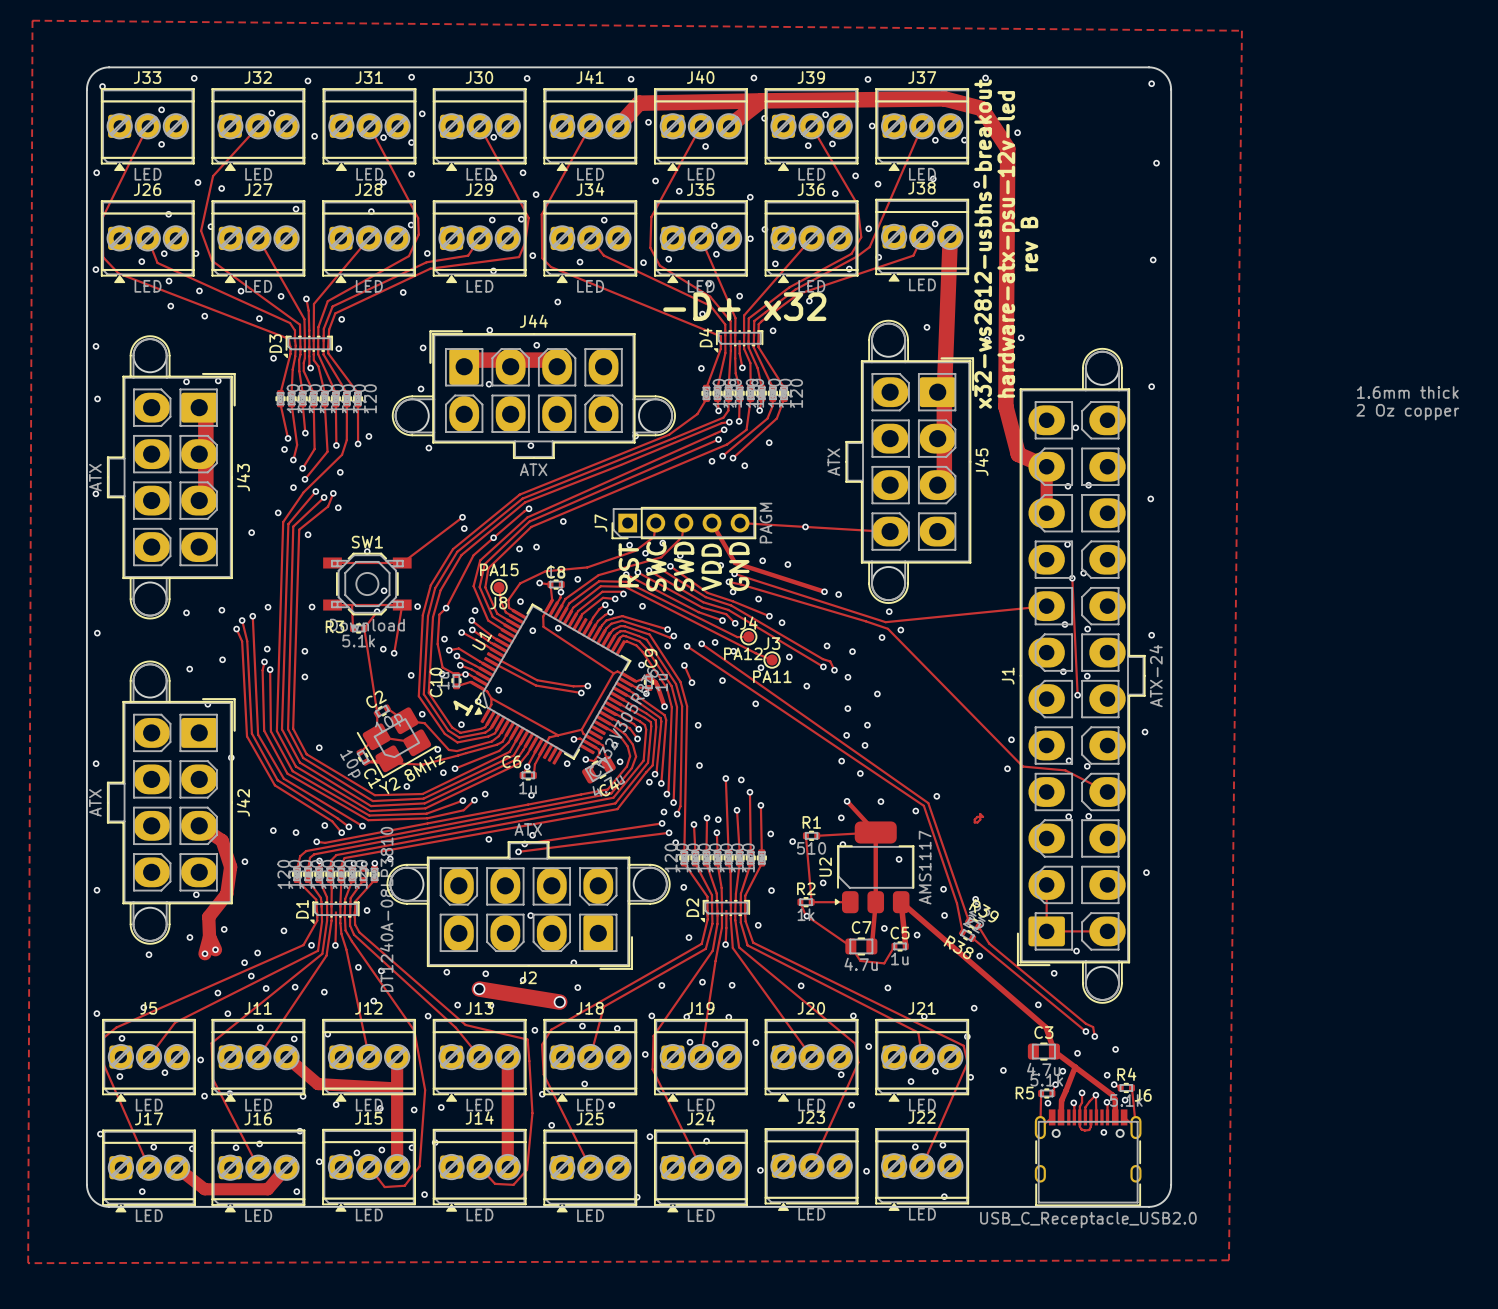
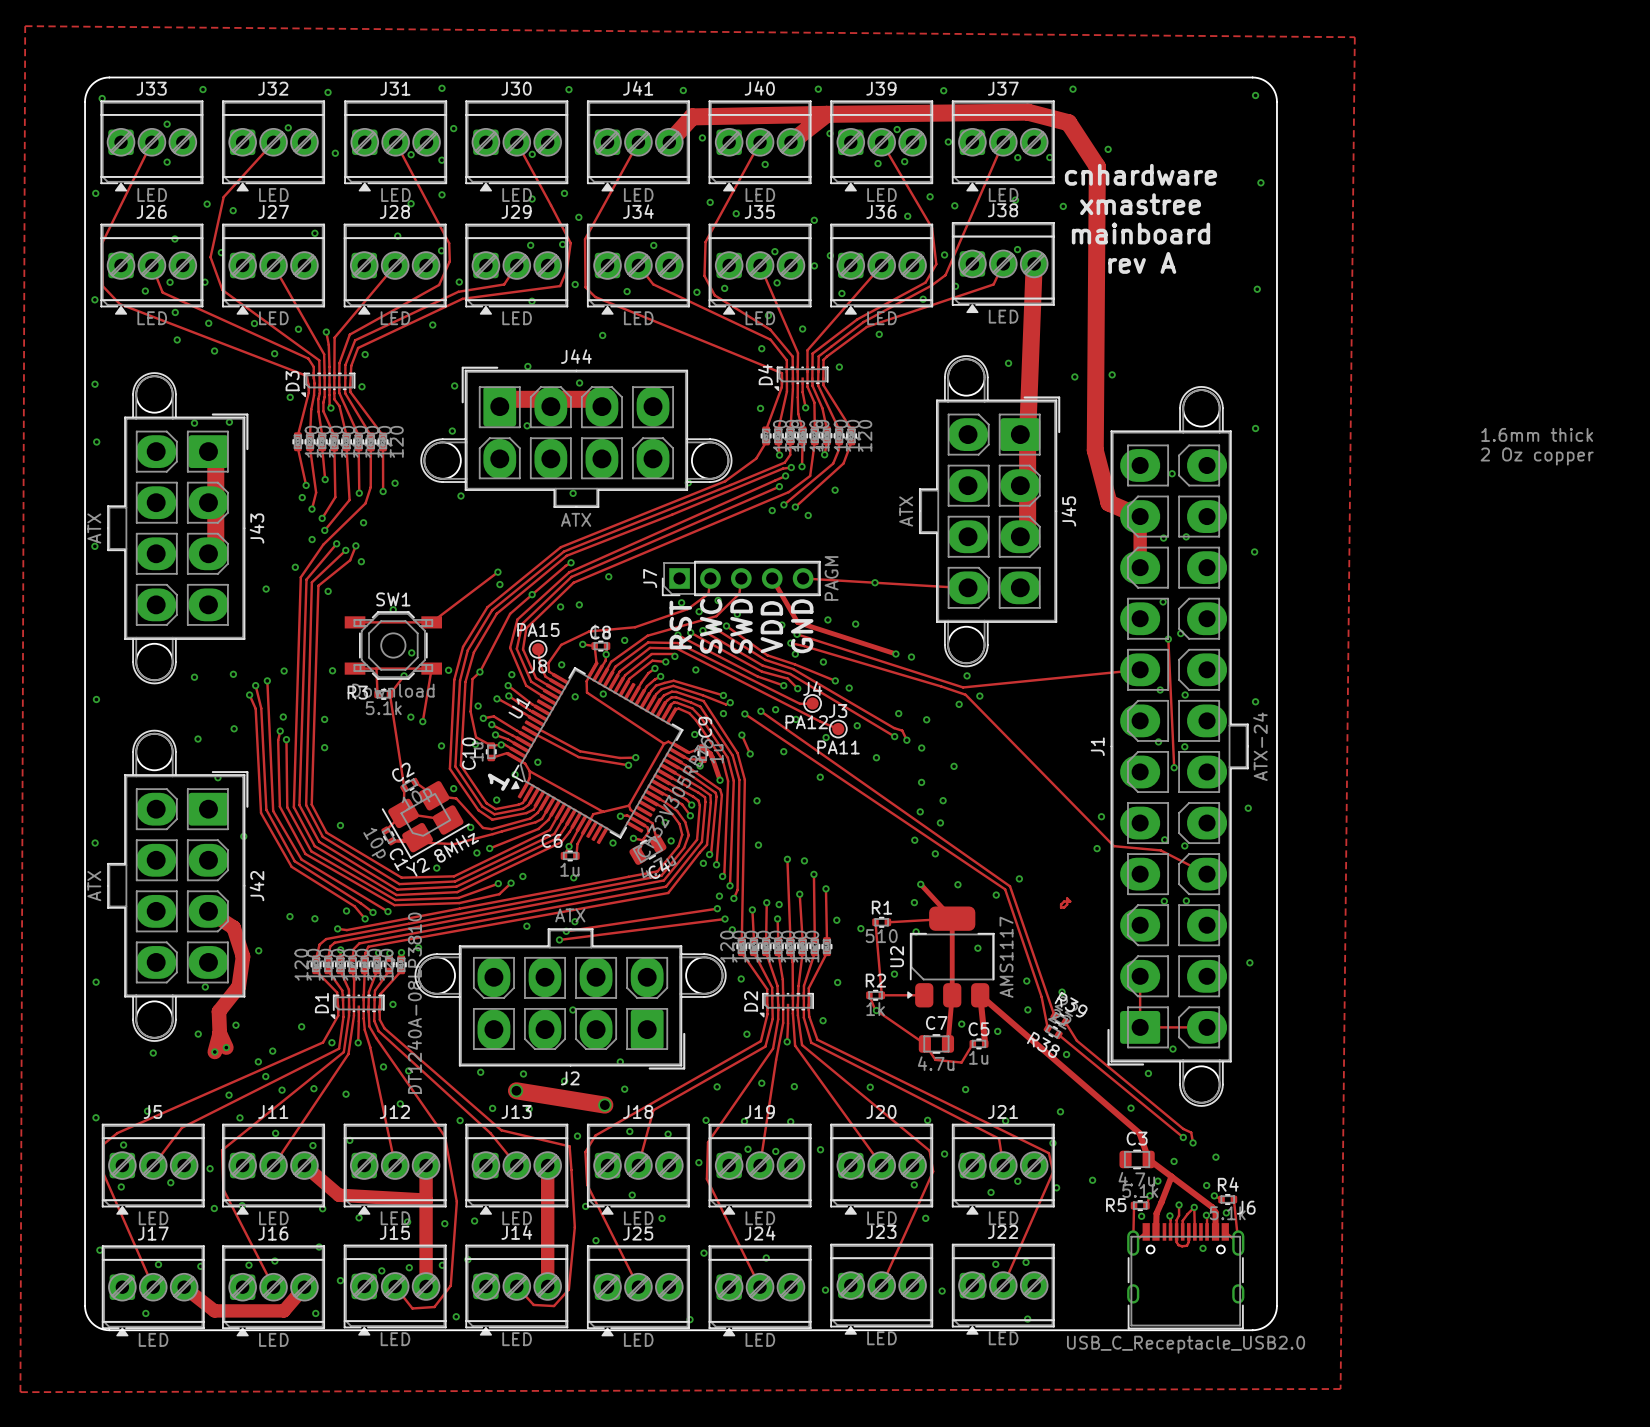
text: none -> cnhardware (1140, 174)
text: none -> xmastree (1140, 204)
text: none -> mainboard (1140, 233)
text: x32-ws2812-usbhs-breakout (983, 244) -> none
text: hardware-atx-psu-12v-led (1008, 244) -> none
text: rev B (1029, 244) -> rev A (1142, 262)
text: -D+ x32 (744, 306) -> none

